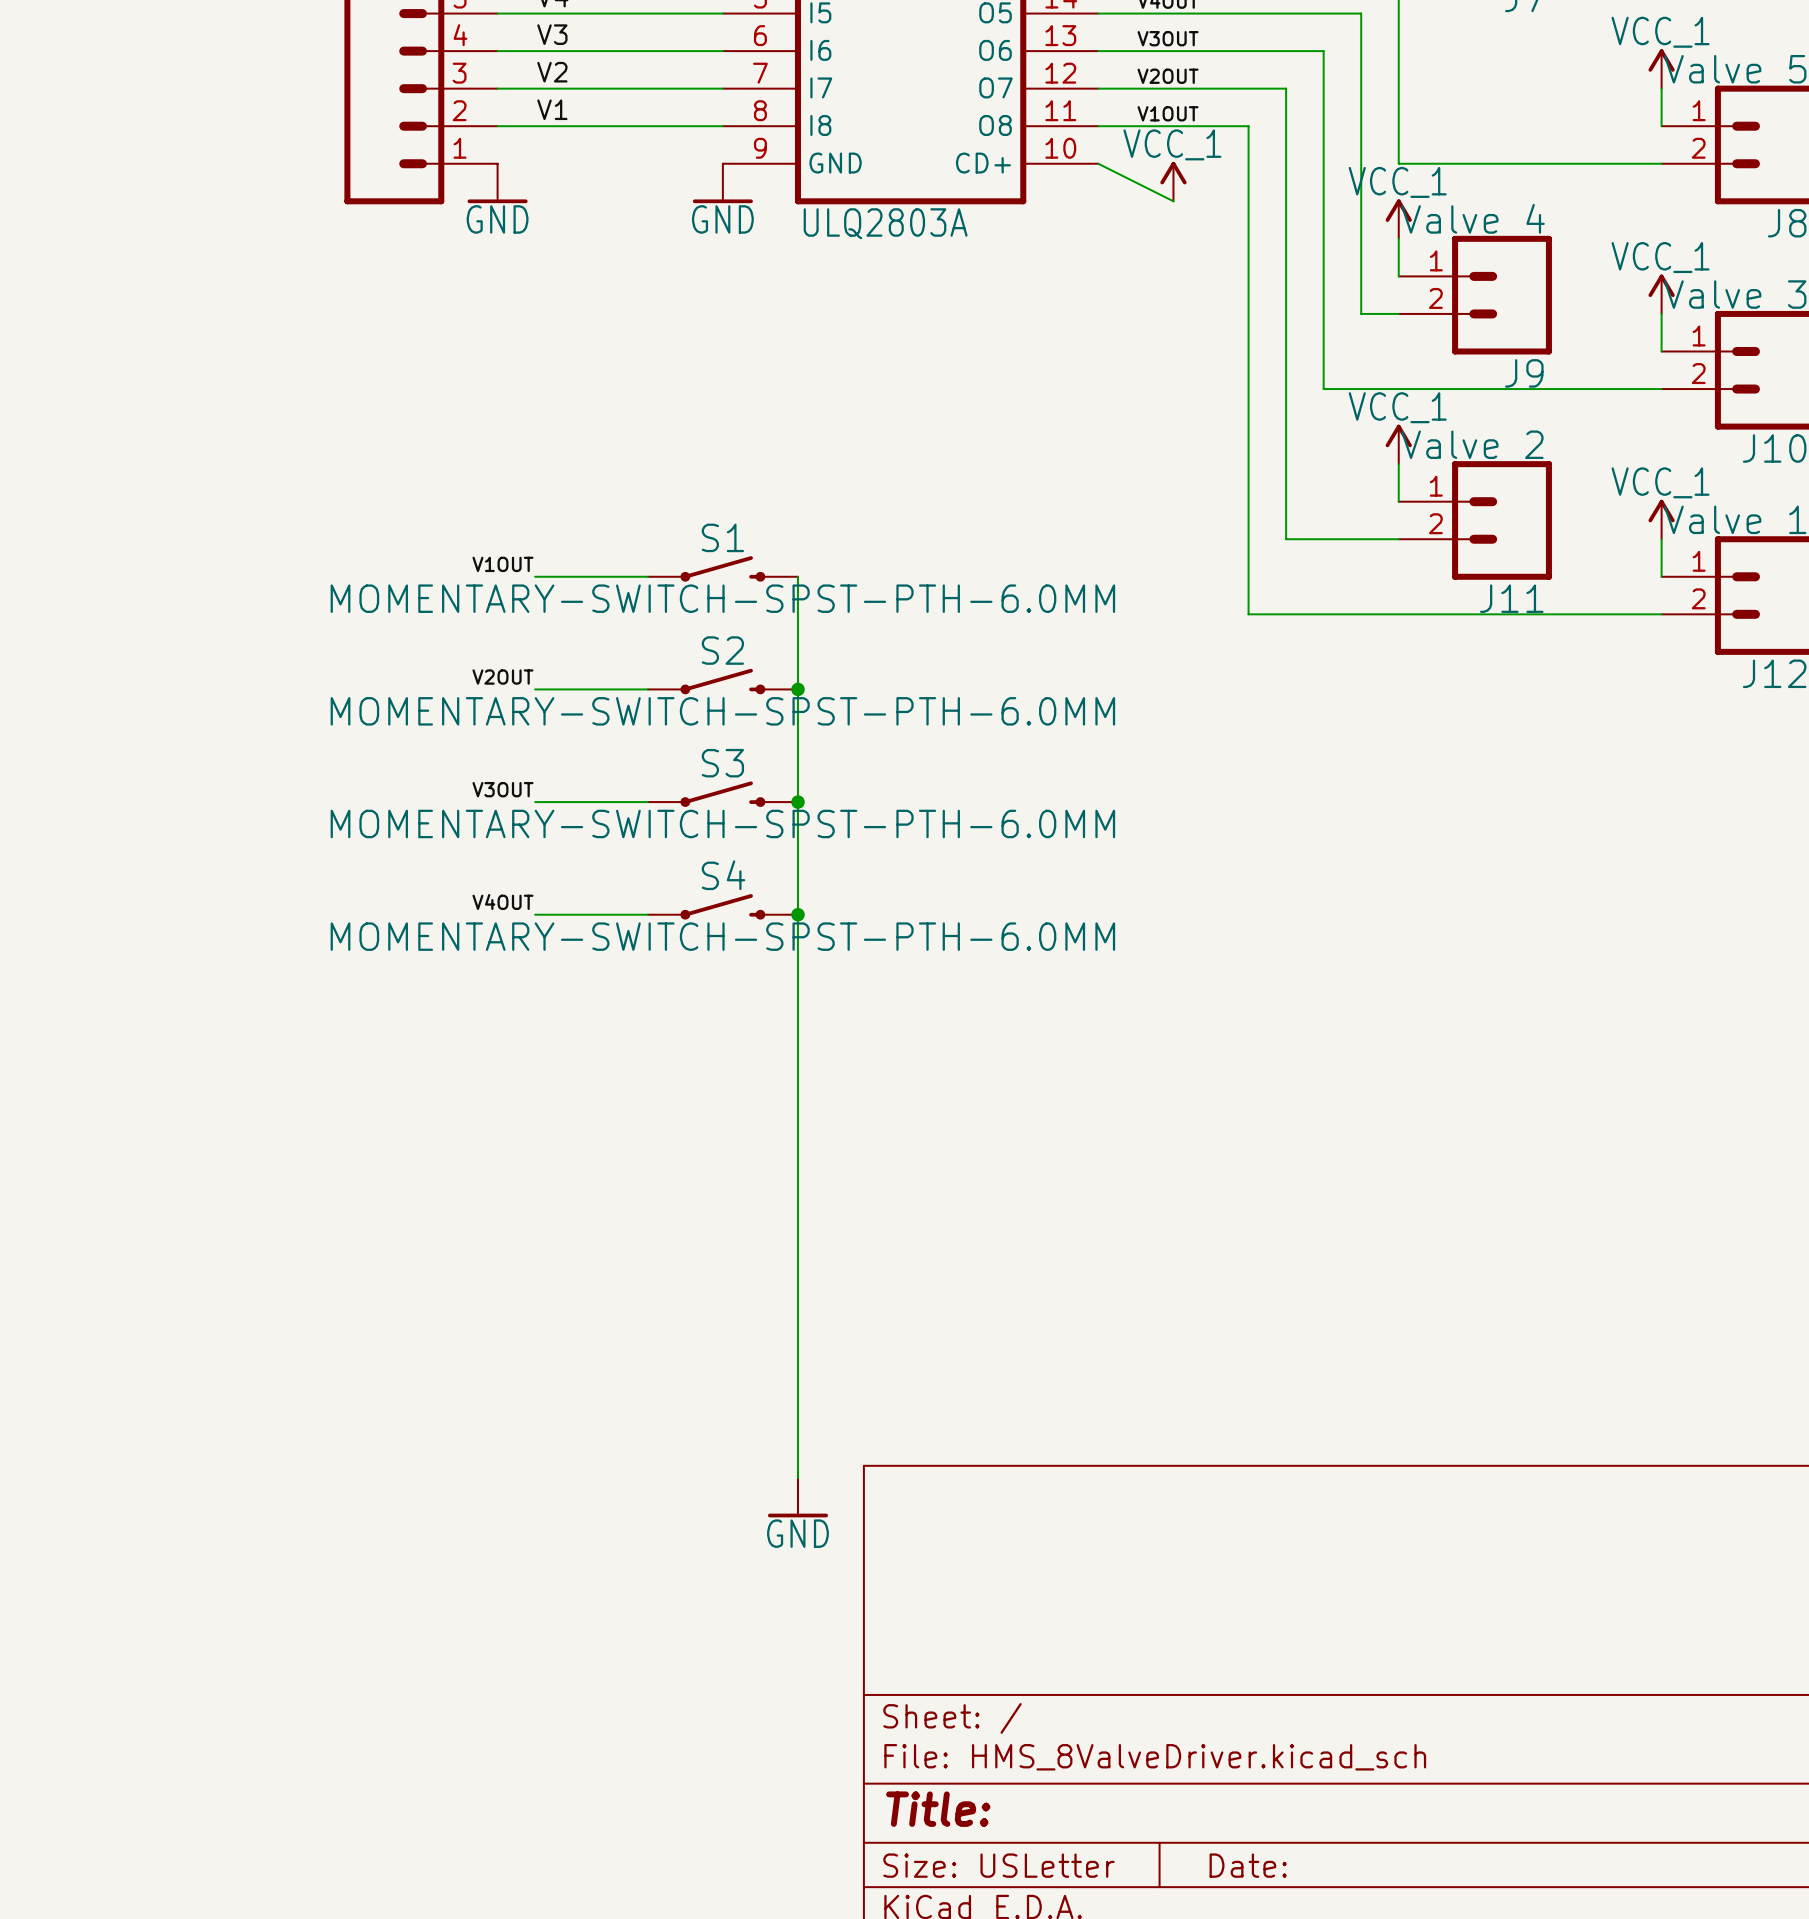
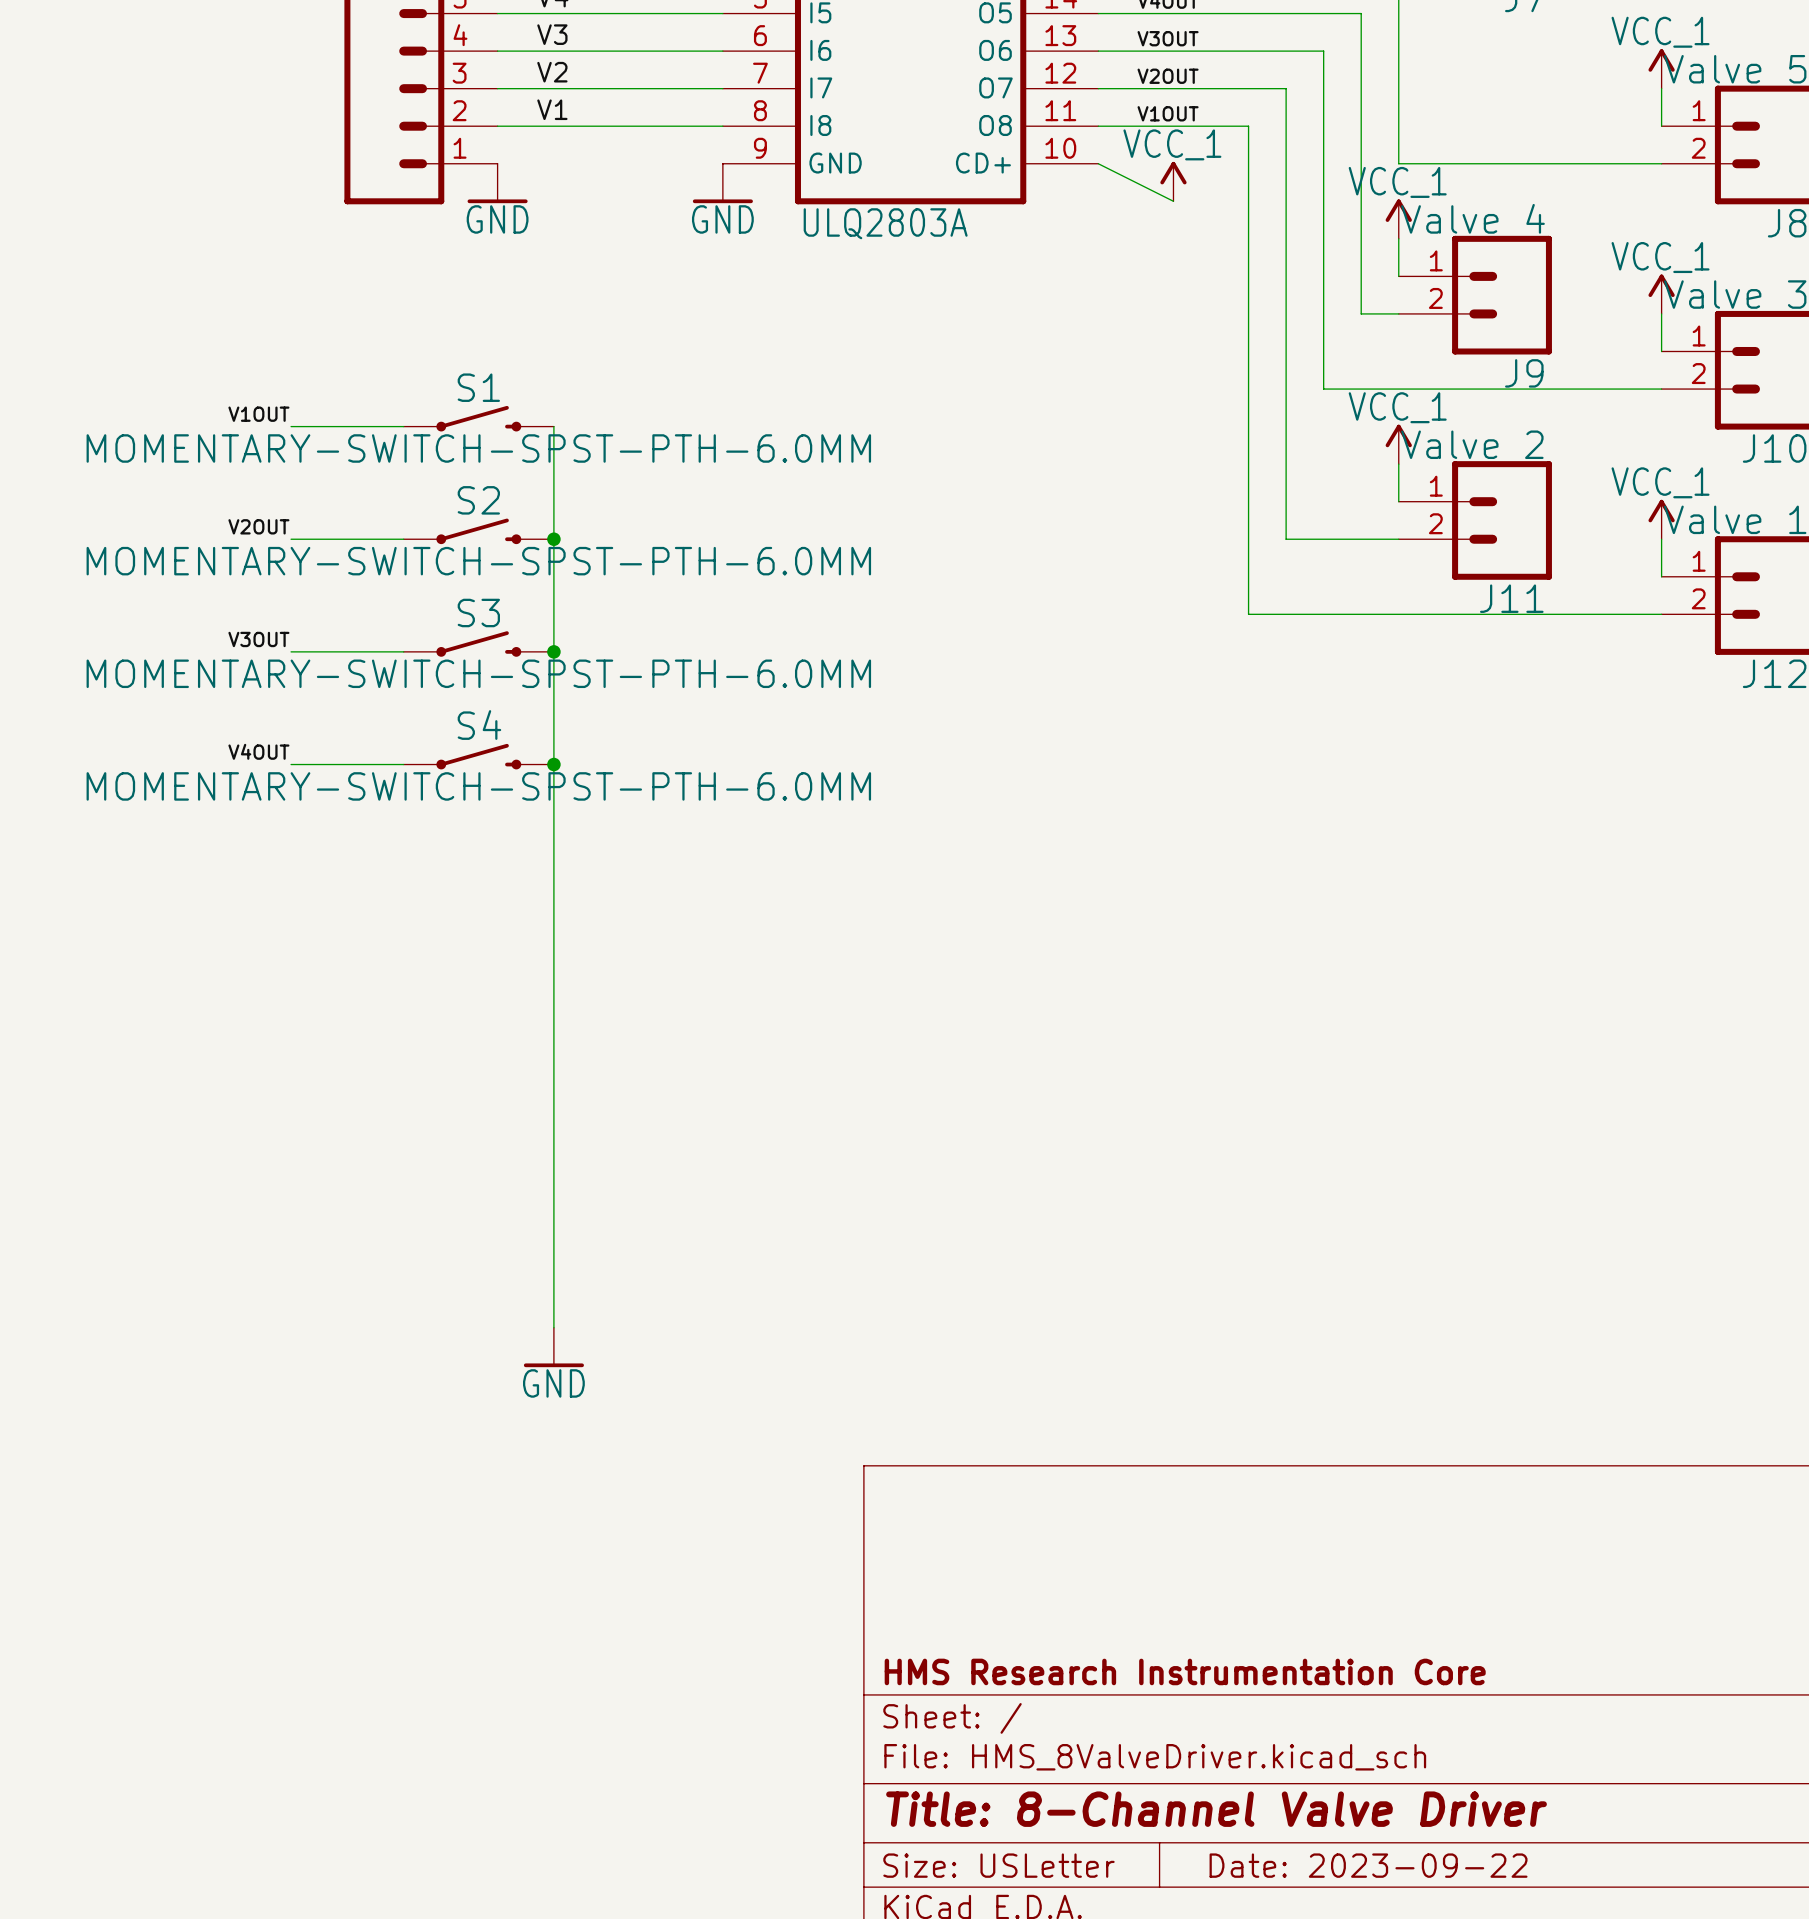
junction: none -> (553, 539)
label position: V1OUT (502, 564) -> V1OUT (258, 414)
S1 position: (722, 568) -> (478, 418)
wire: (535, 576) (647, 576) -> (291, 426) (403, 426)
wire: (797, 576) (797, 1477) -> (553, 426) (553, 1327)
junction: none -> (553, 651)
label position: V2OUT (502, 677) -> V2OUT (258, 526)
S2 position: (722, 681) -> (478, 531)
wire: (535, 689) (647, 689) -> (291, 539) (403, 539)
junction: (797, 689) -> none
junction: none -> (553, 764)
label position: V3OUT (502, 789) -> V3OUT (258, 639)
S3 position: (722, 794) -> (478, 643)
wire: (535, 802) (647, 802) -> (291, 651) (403, 651)
junction: (797, 802) -> none
label position: V4OUT (502, 902) -> V4OUT (258, 751)
S4 position: (722, 906) -> (478, 756)
wire: (535, 914) (647, 914) -> (291, 764) (403, 764)
junction: (797, 914) -> none
power symbol position: GND (797, 1497) -> GND (553, 1347)
title block: none -> HMS Research Instrumentation Core (1185, 1671)
title block: Title: (938, 1809) -> Title: 8-Channel Valve Driver (1216, 1809)
title block: Date: (1248, 1865) -> Date: 2023-09-22 (1368, 1865)

